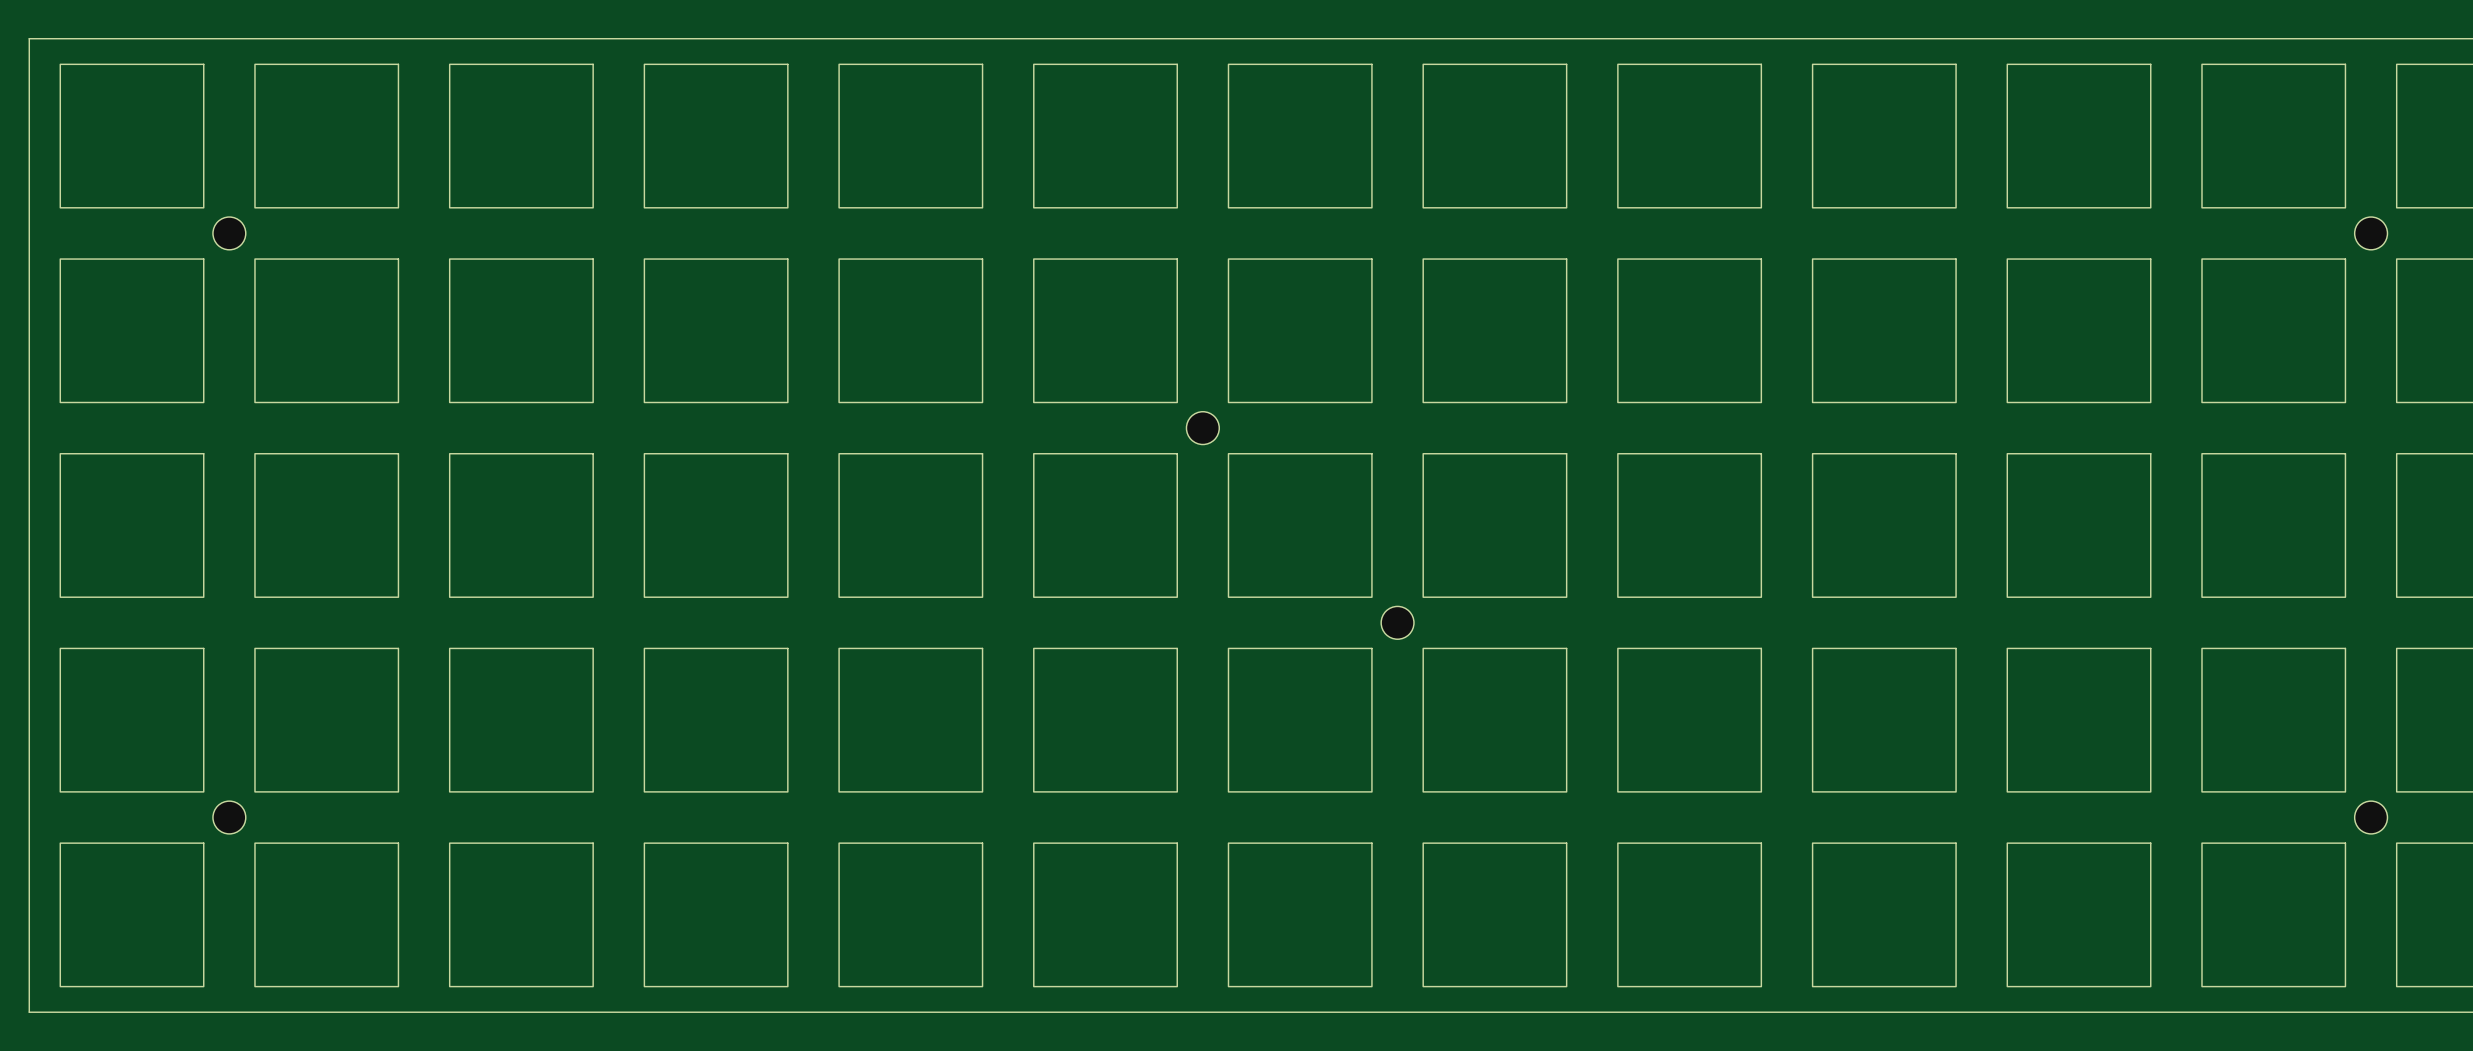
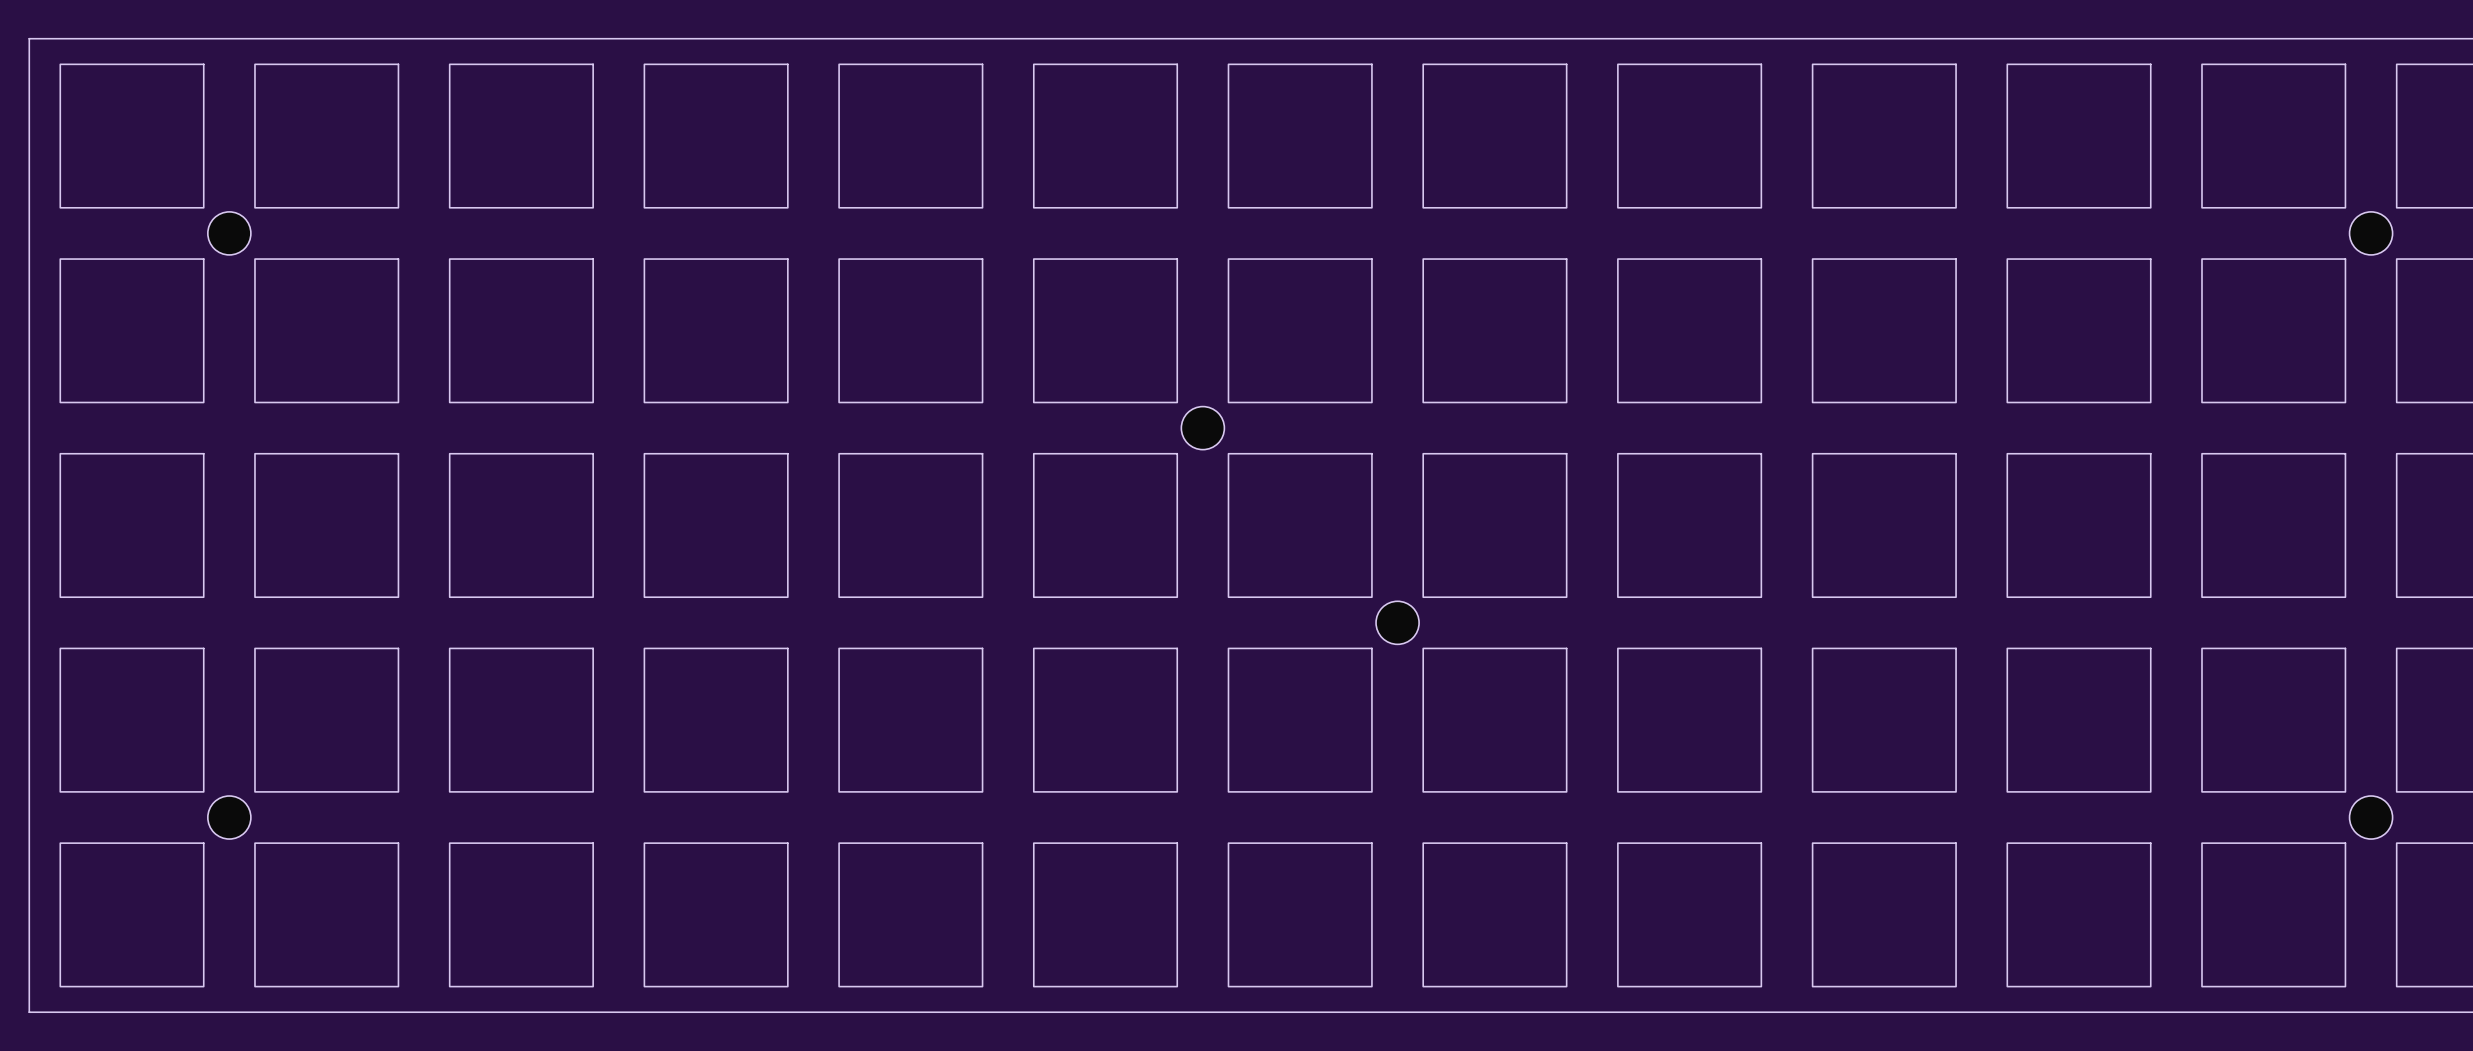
part footprint: [212, 217, 246, 250] -> [207, 211, 251, 255]
part footprint: [2354, 217, 2388, 250] -> [2349, 211, 2393, 255]
part footprint: [1186, 411, 1220, 445] -> [1181, 406, 1225, 450]
part footprint: [1381, 606, 1414, 640] -> [1376, 601, 1420, 645]
part footprint: [212, 801, 246, 834] -> [207, 796, 251, 840]
part footprint: [2354, 801, 2388, 834] -> [2349, 796, 2393, 840]

